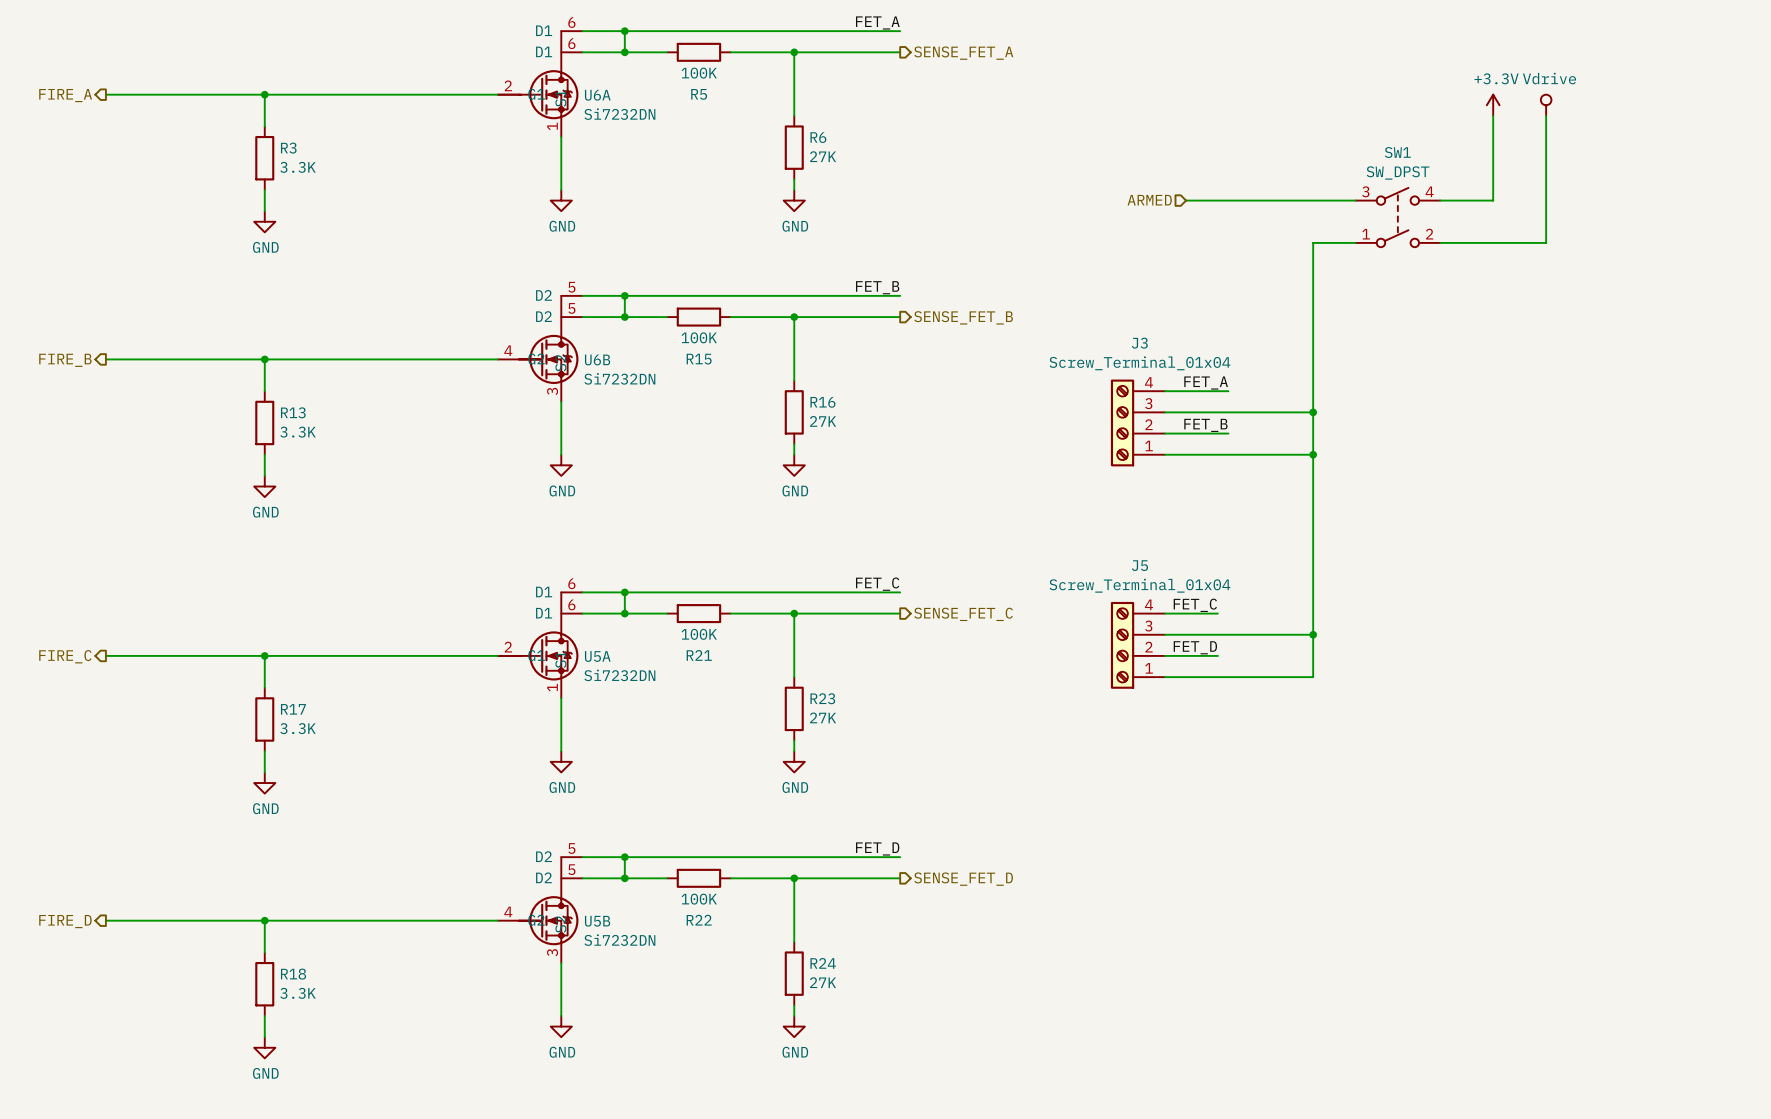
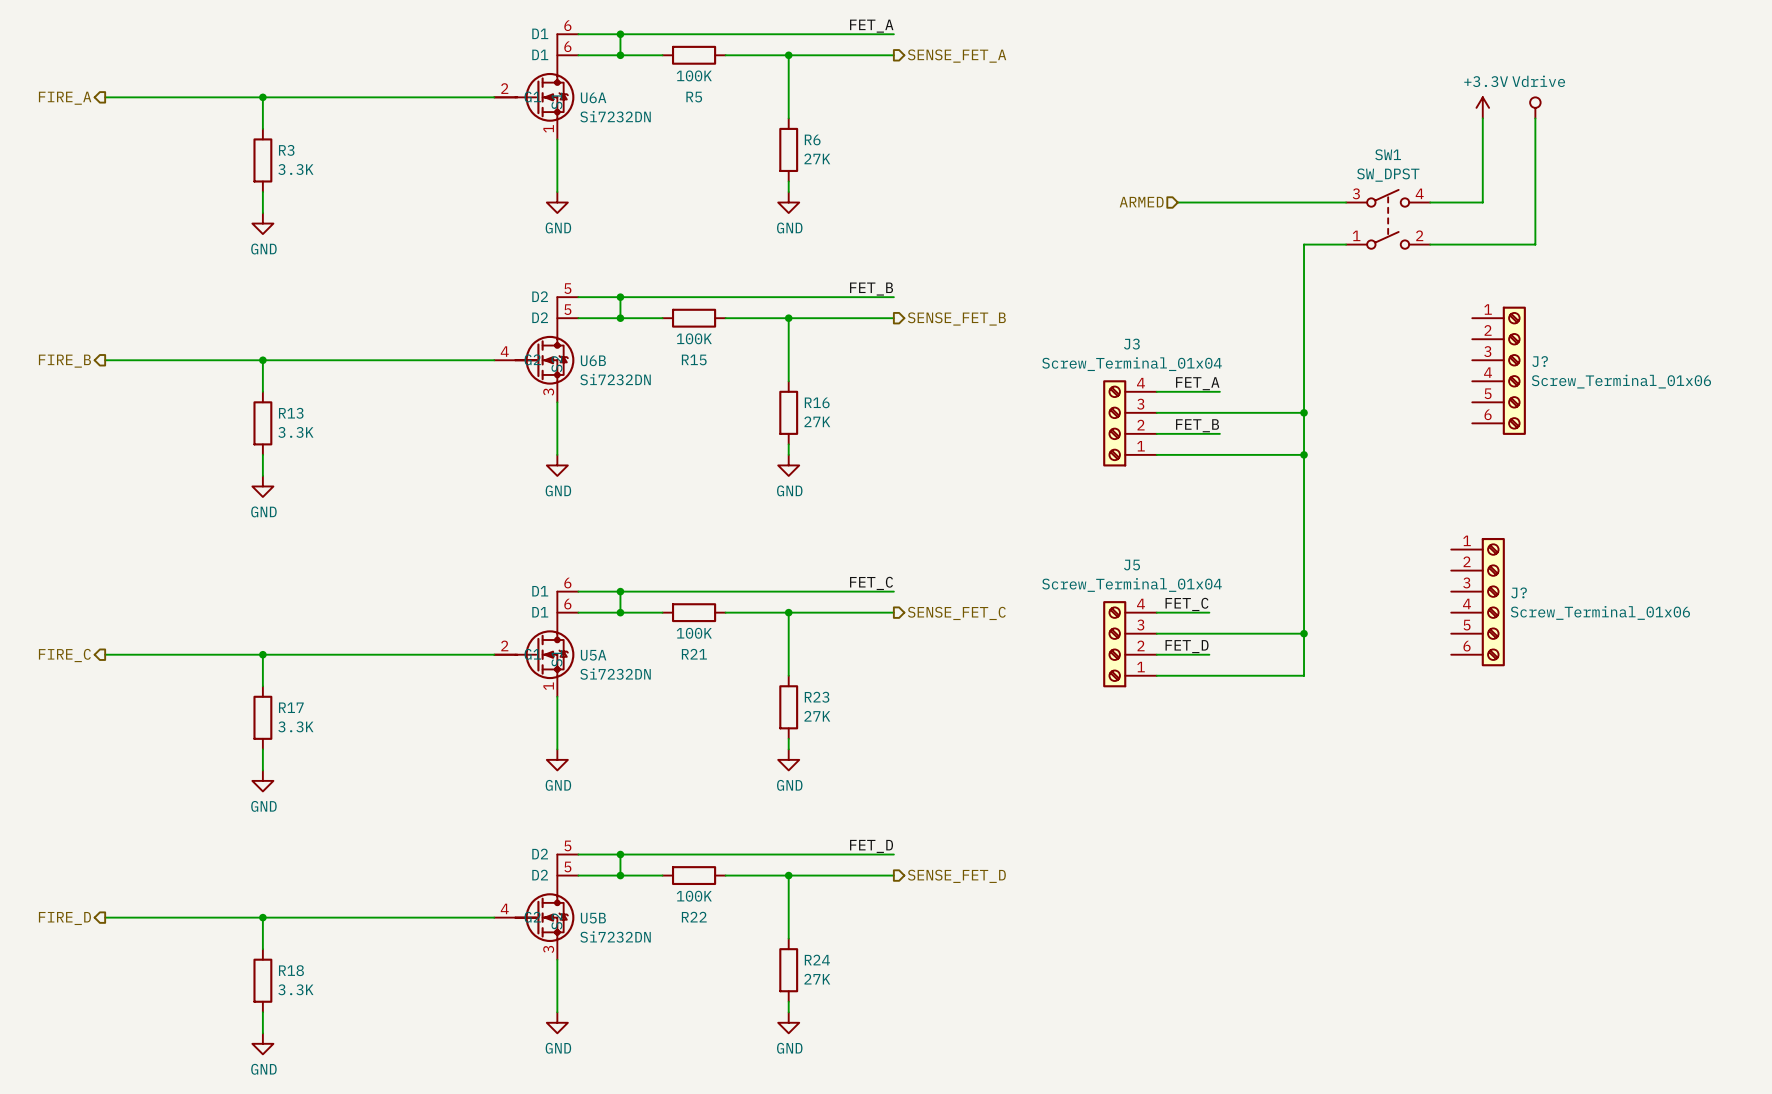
J?: none -> Screw_Terminal_01x06 (1499, 370)
J?: none -> Screw_Terminal_01x06 (1478, 602)

